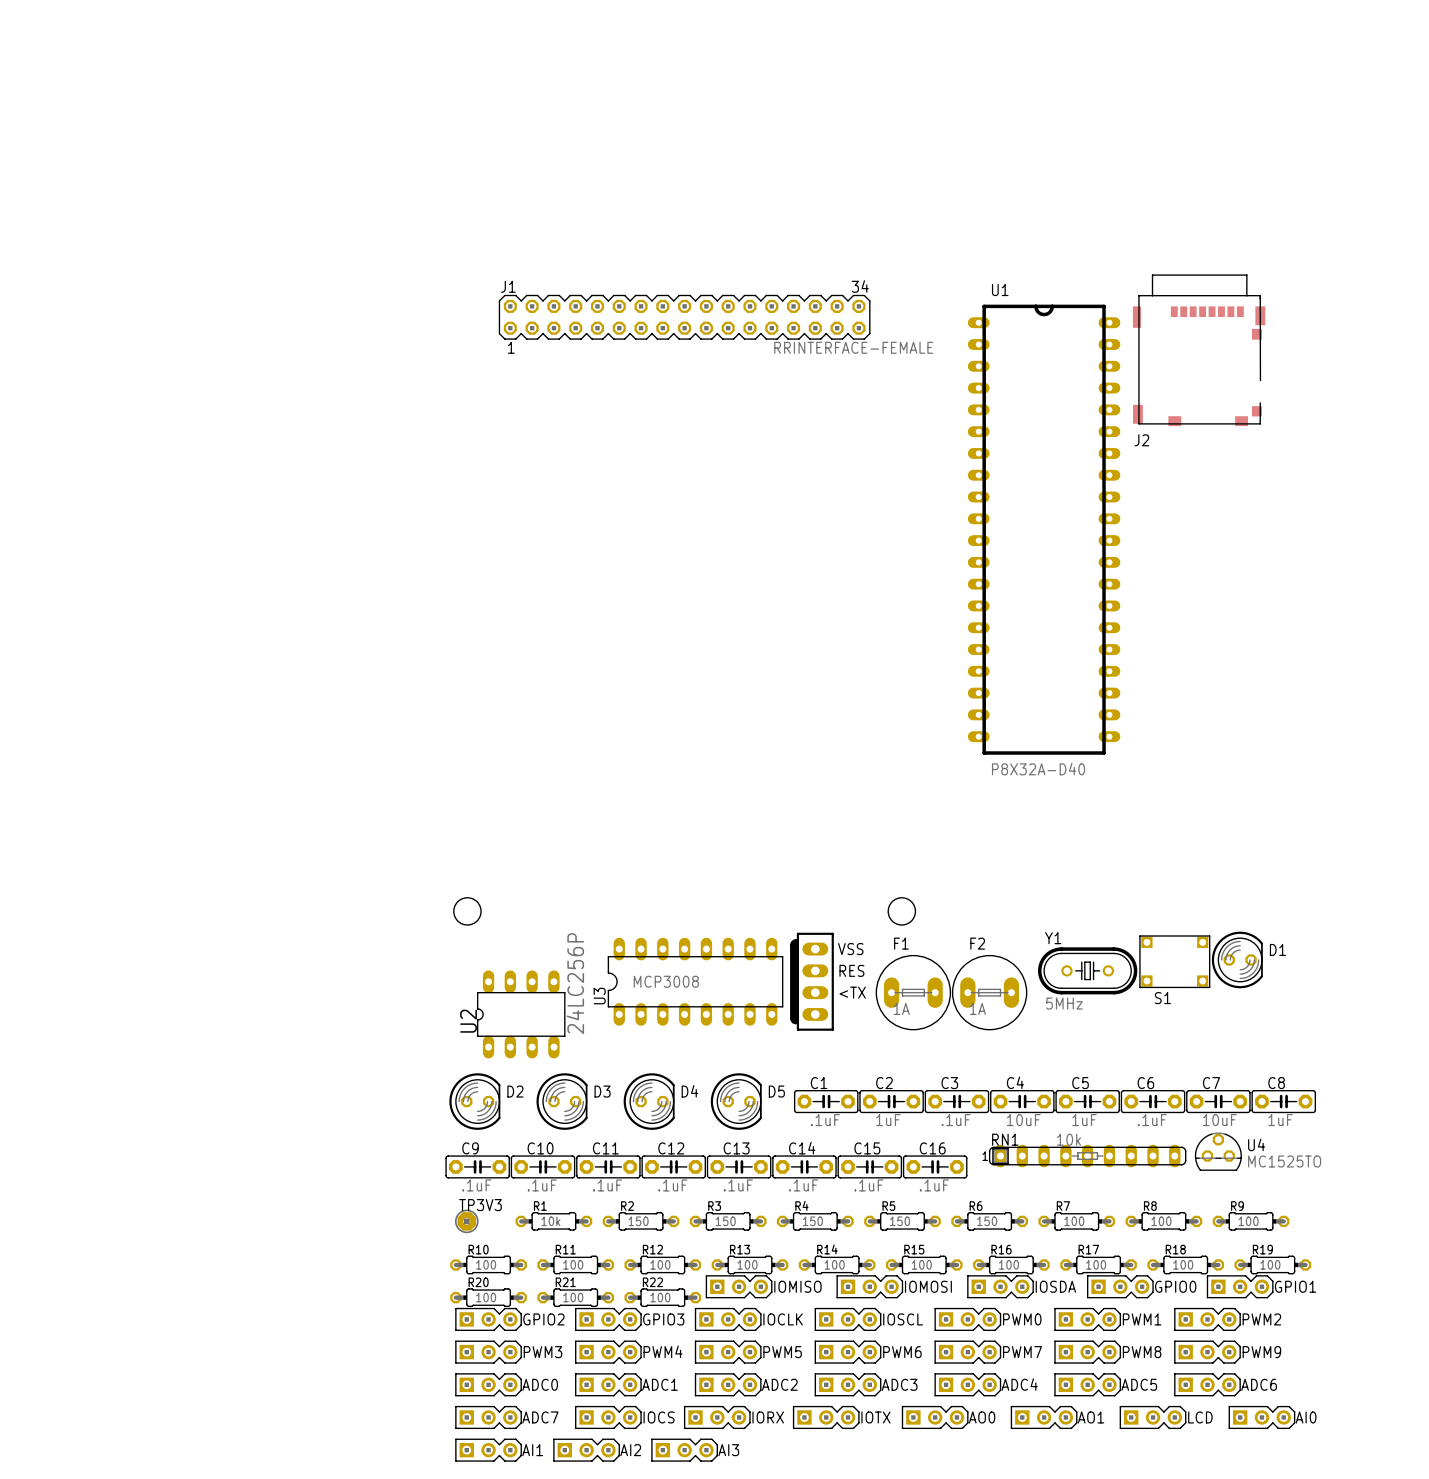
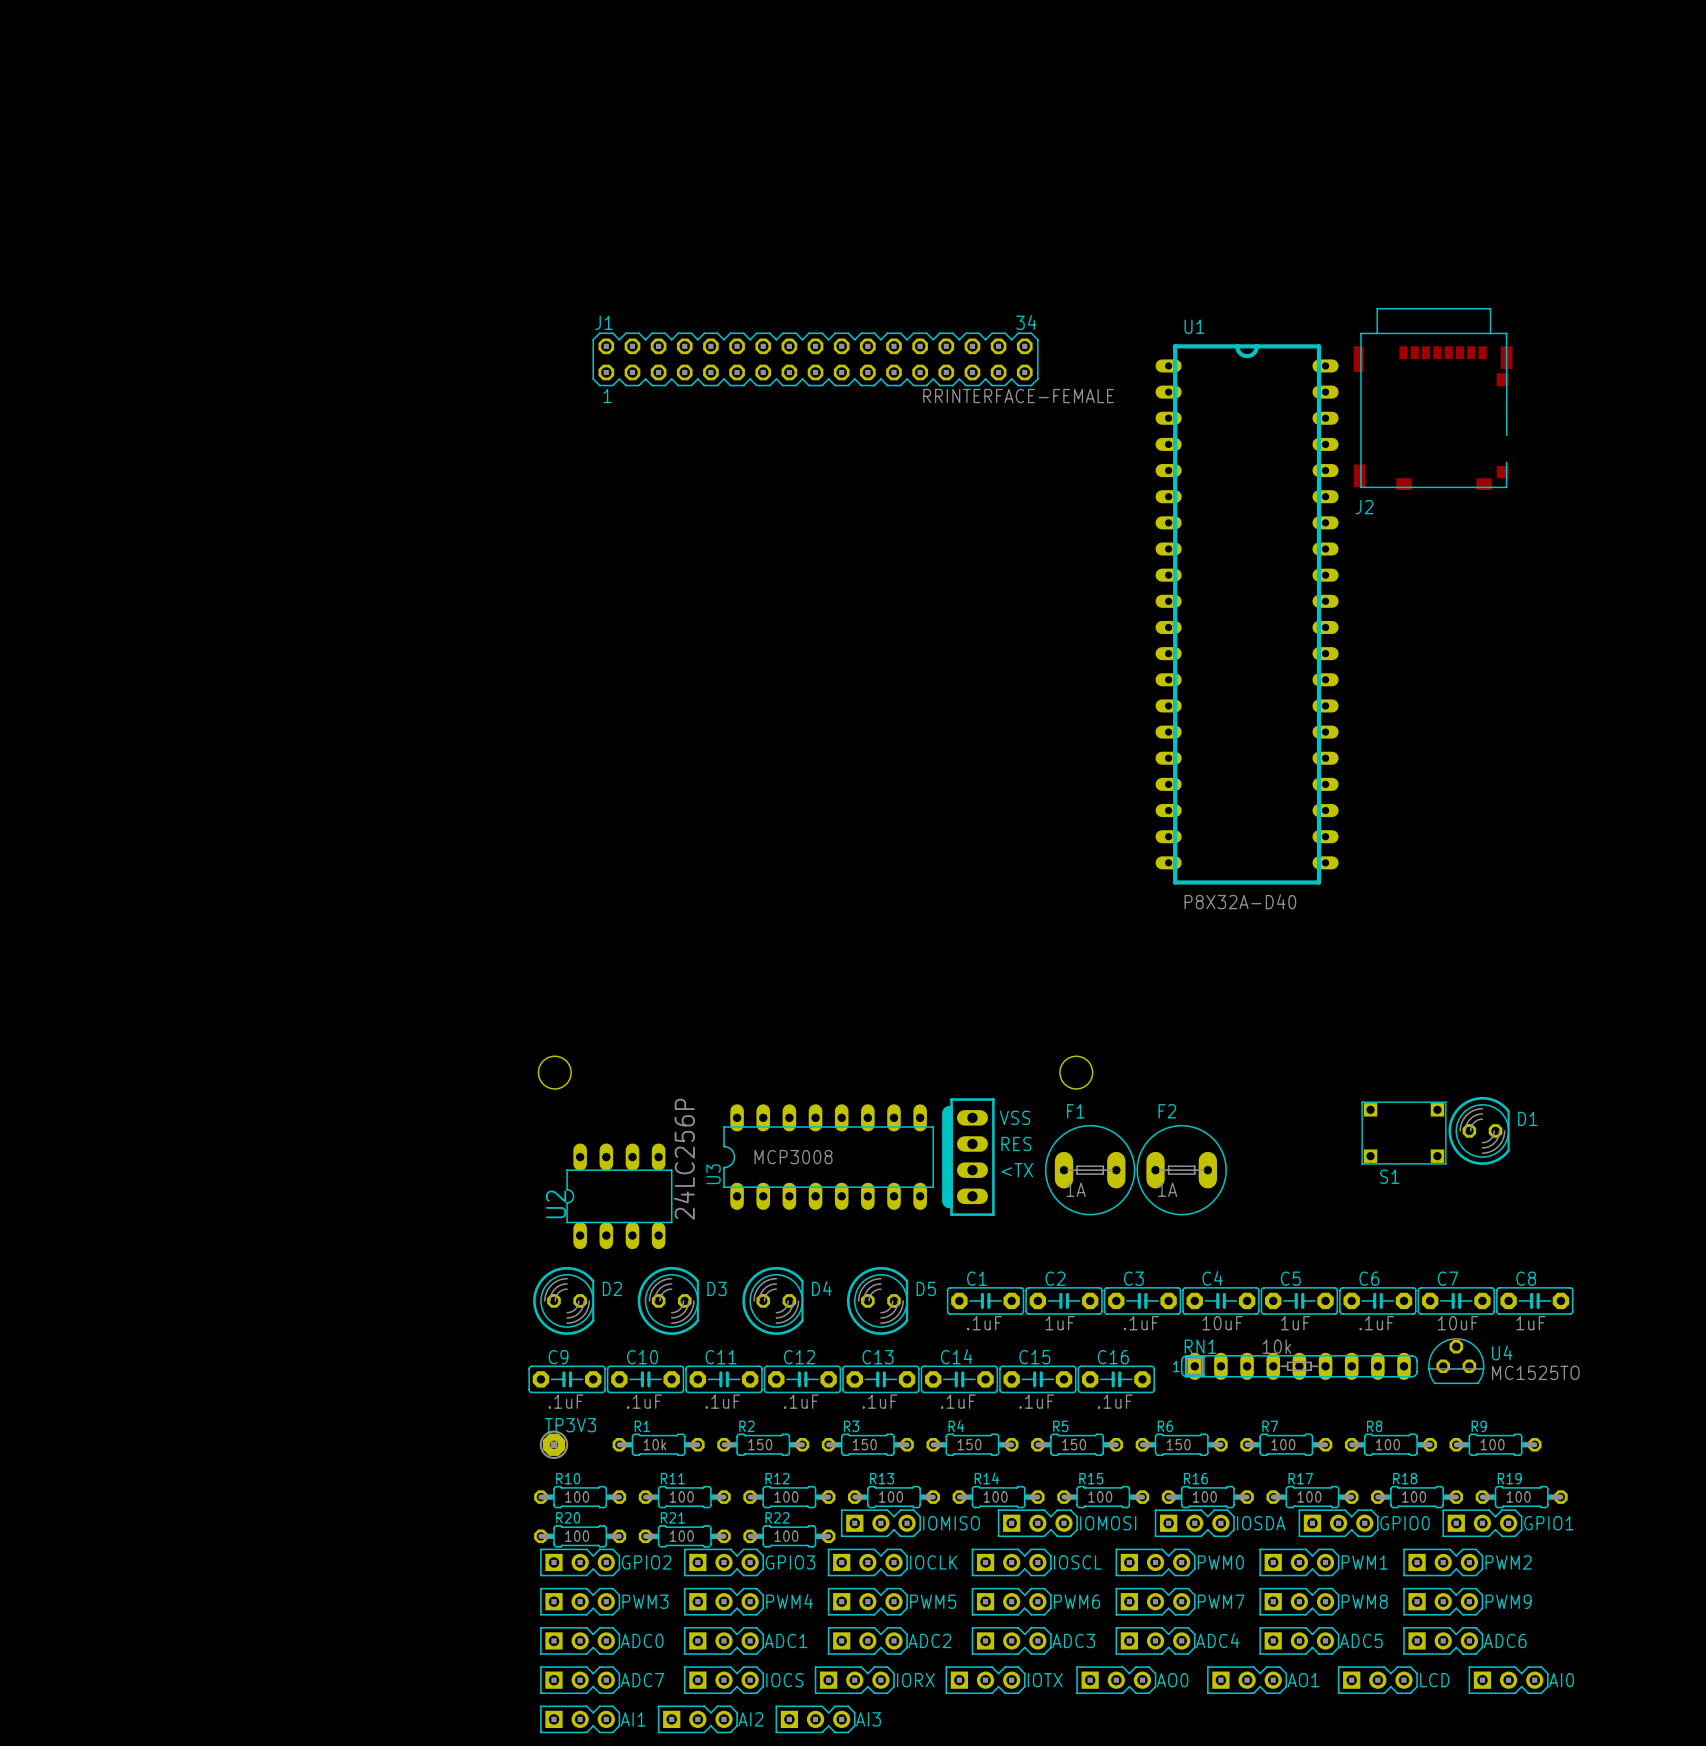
Y1: 5MHz (1087, 970) -> none

